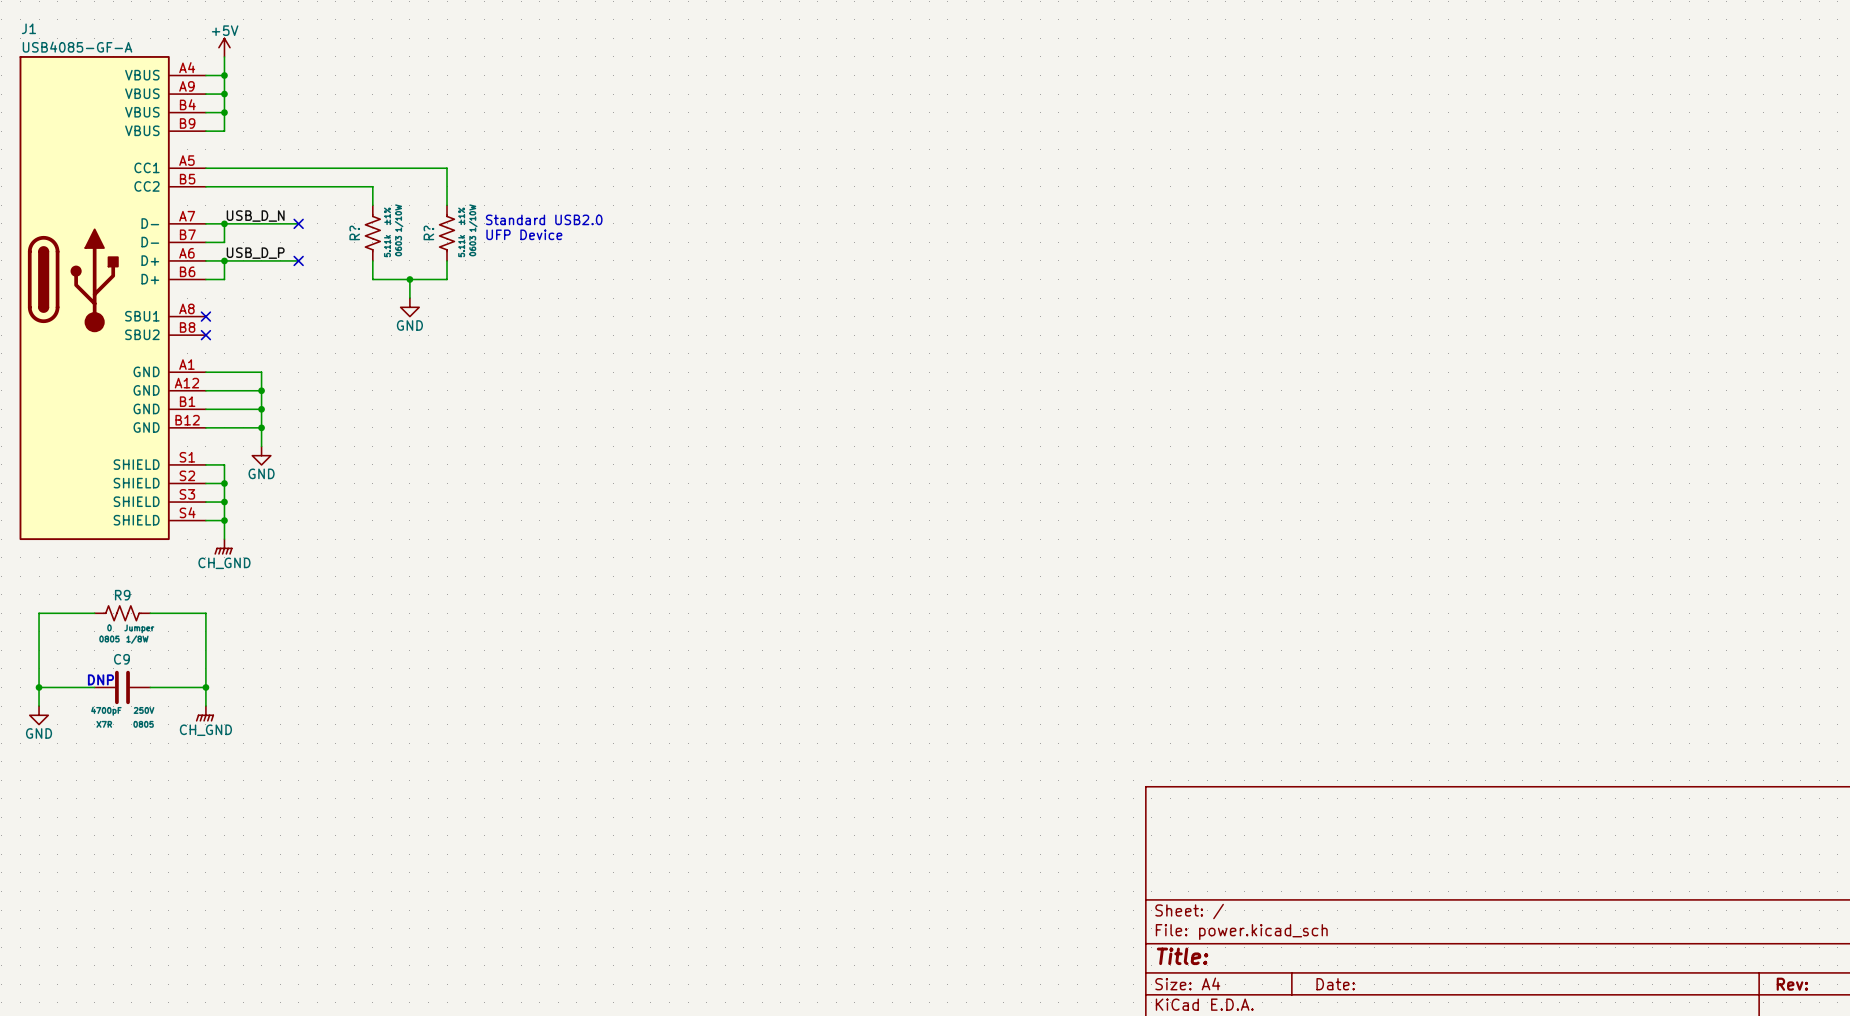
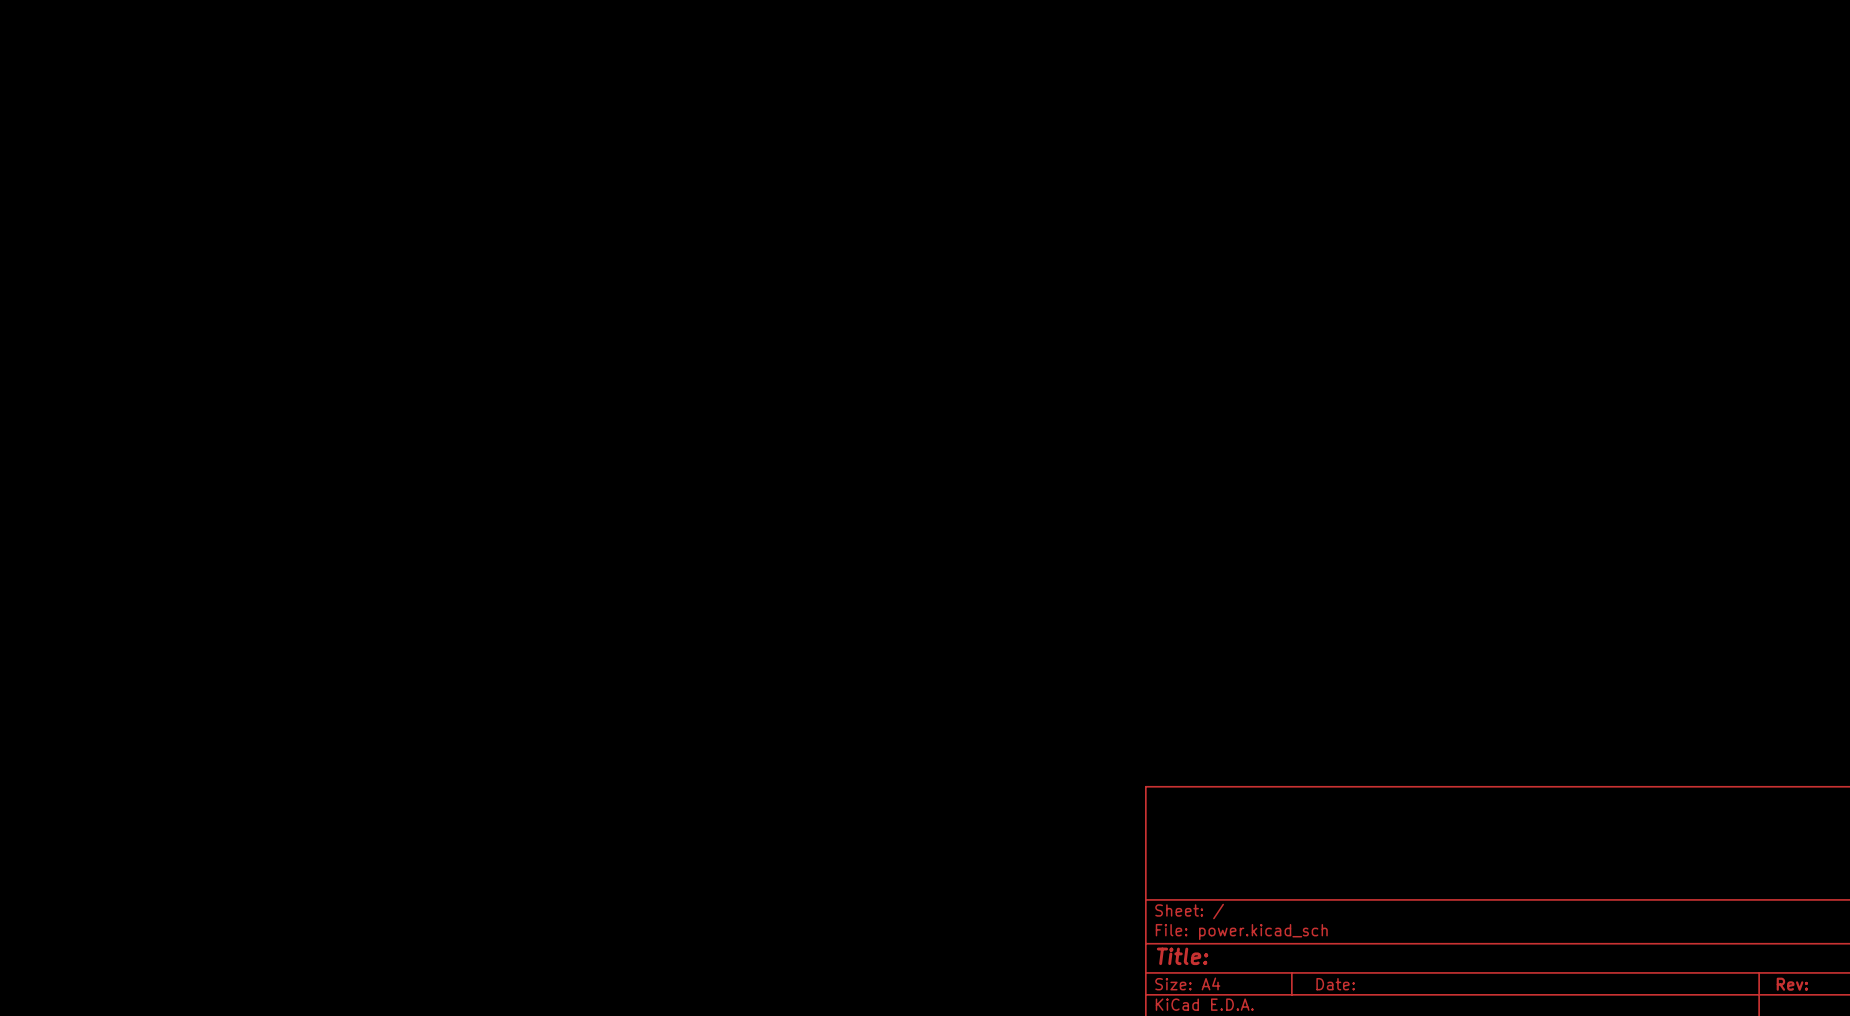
power symbol: +5V (224, 47) -> none
wire: (224, 56) (224, 131) (205, 131) -> none
wire: (205, 75) (224, 75) -> none
junction: (224, 75) -> none
wire: (205, 94) (224, 94) -> none
junction: (224, 94) -> none
wire: (205, 112) (224, 112) -> none
junction: (224, 112) -> none
wire: (205, 168) (447, 168) (447, 205) -> none
wire: (205, 186) (372, 186) (372, 205) -> none
label: USB_D_N (255, 216) -> none
text: Standard USB2.0 (544, 219) -> none
wire: (205, 223) (298, 223) -> none
wire: (224, 223) (224, 242) (205, 242) -> none
junction: (224, 223) -> none
no-connect mark: (298, 223) -> none
R?: (372, 233) -> none
R?: (447, 233) -> none
text: UFP Device (524, 234) -> none
label: USB_D_P (255, 253) -> none
wire: (205, 260) (298, 260) -> none
wire: (224, 260) (224, 279) (205, 279) -> none
junction: (224, 260) -> none
no-connect mark: (298, 260) -> none
wire: (372, 260) (372, 279) (447, 279) (447, 260) -> none
wire: (409, 279) (409, 298) -> none
junction: (409, 279) -> none
J1: (112, 298) -> none
power symbol: GND (409, 307) -> none
no-connect mark: (205, 316) -> none
no-connect mark: (205, 335) -> none
wire: (205, 372) (261, 372) (261, 446) -> none
wire: (205, 390) (261, 390) -> none
junction: (261, 390) -> none
wire: (205, 409) (261, 409) -> none
junction: (261, 409) -> none
wire: (205, 427) (261, 427) -> none
junction: (261, 427) -> none
power symbol: GND (261, 455) -> none
wire: (205, 464) (224, 464) (224, 539) -> none
wire: (205, 483) (224, 483) -> none
junction: (224, 483) -> none
wire: (205, 502) (224, 502) -> none
junction: (224, 502) -> none
wire: (205, 520) (224, 520) -> none
junction: (224, 520) -> none
power symbol: CH_GND (223, 546) -> none
wire: (94, 613) (39, 613) (39, 706) -> none
R9: (122, 613) -> none
wire: (150, 613) (205, 613) (205, 706) -> none
text: DNP (100, 679) -> none
wire: (39, 687) (94, 687) -> none
junction: (39, 687) -> none
C9: (122, 687) -> none
wire: (150, 687) (205, 687) -> none
junction: (205, 687) -> none
power symbol: CH_GND (204, 713) -> none
power symbol: GND (39, 715) -> none

